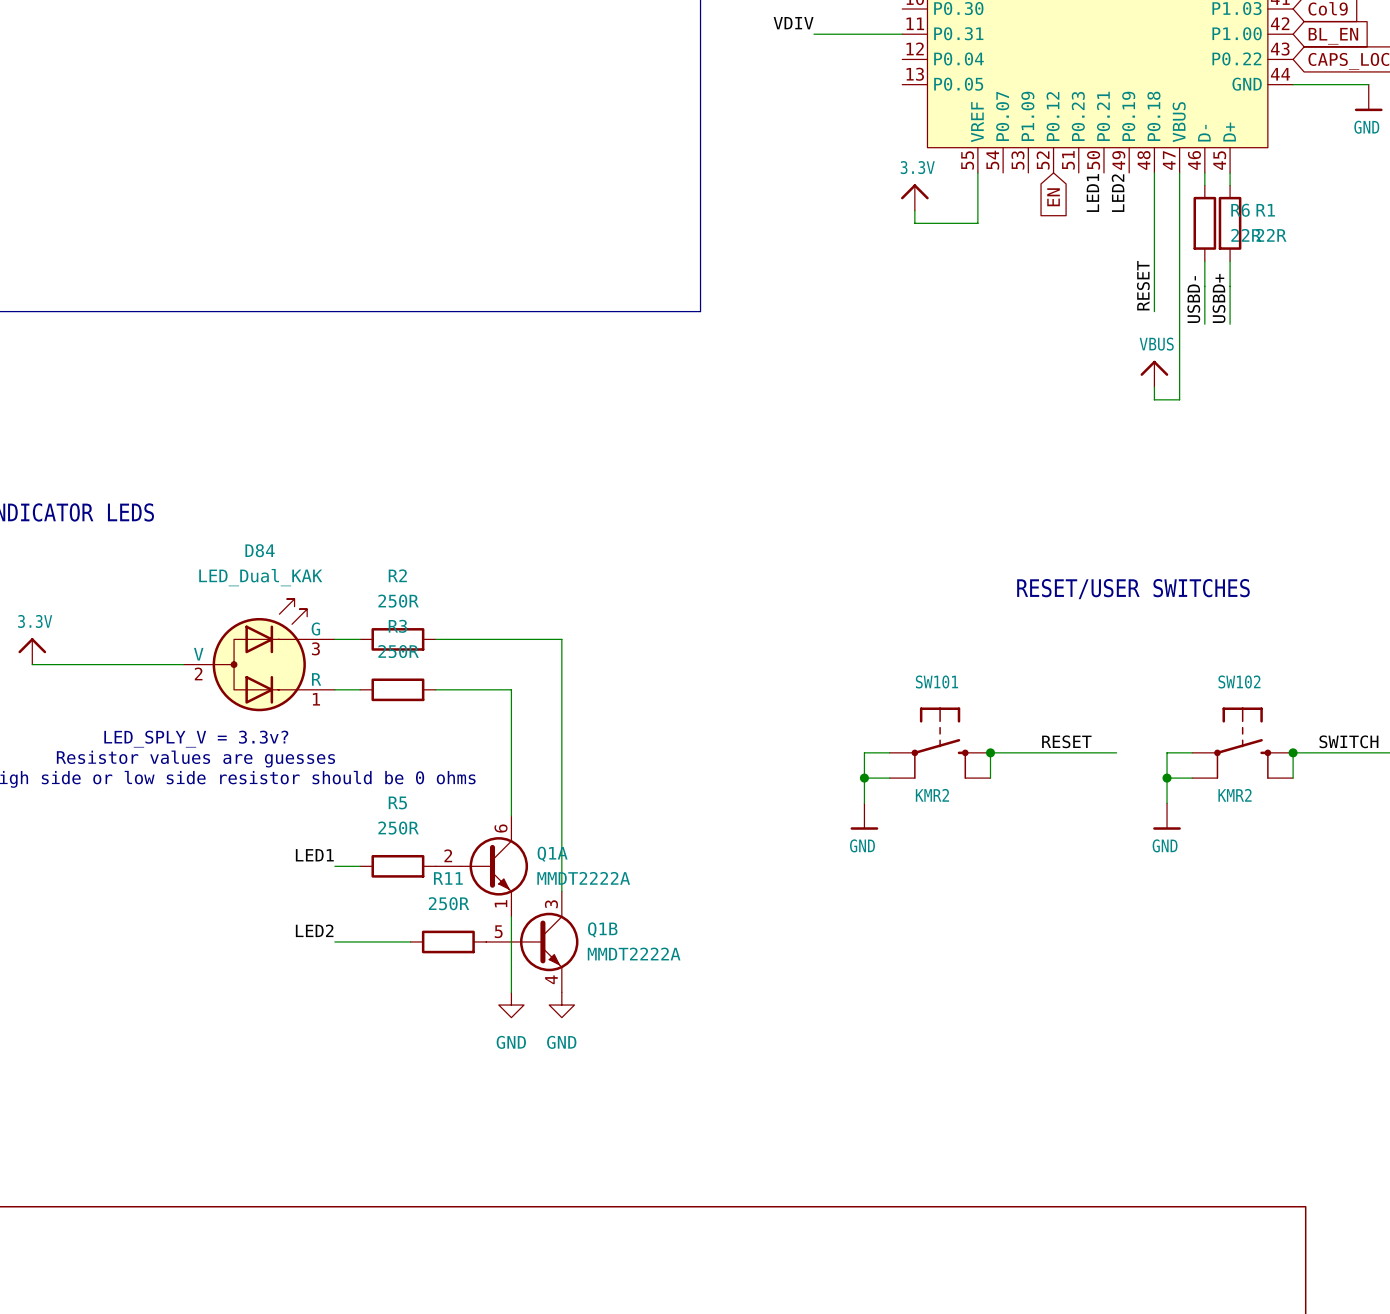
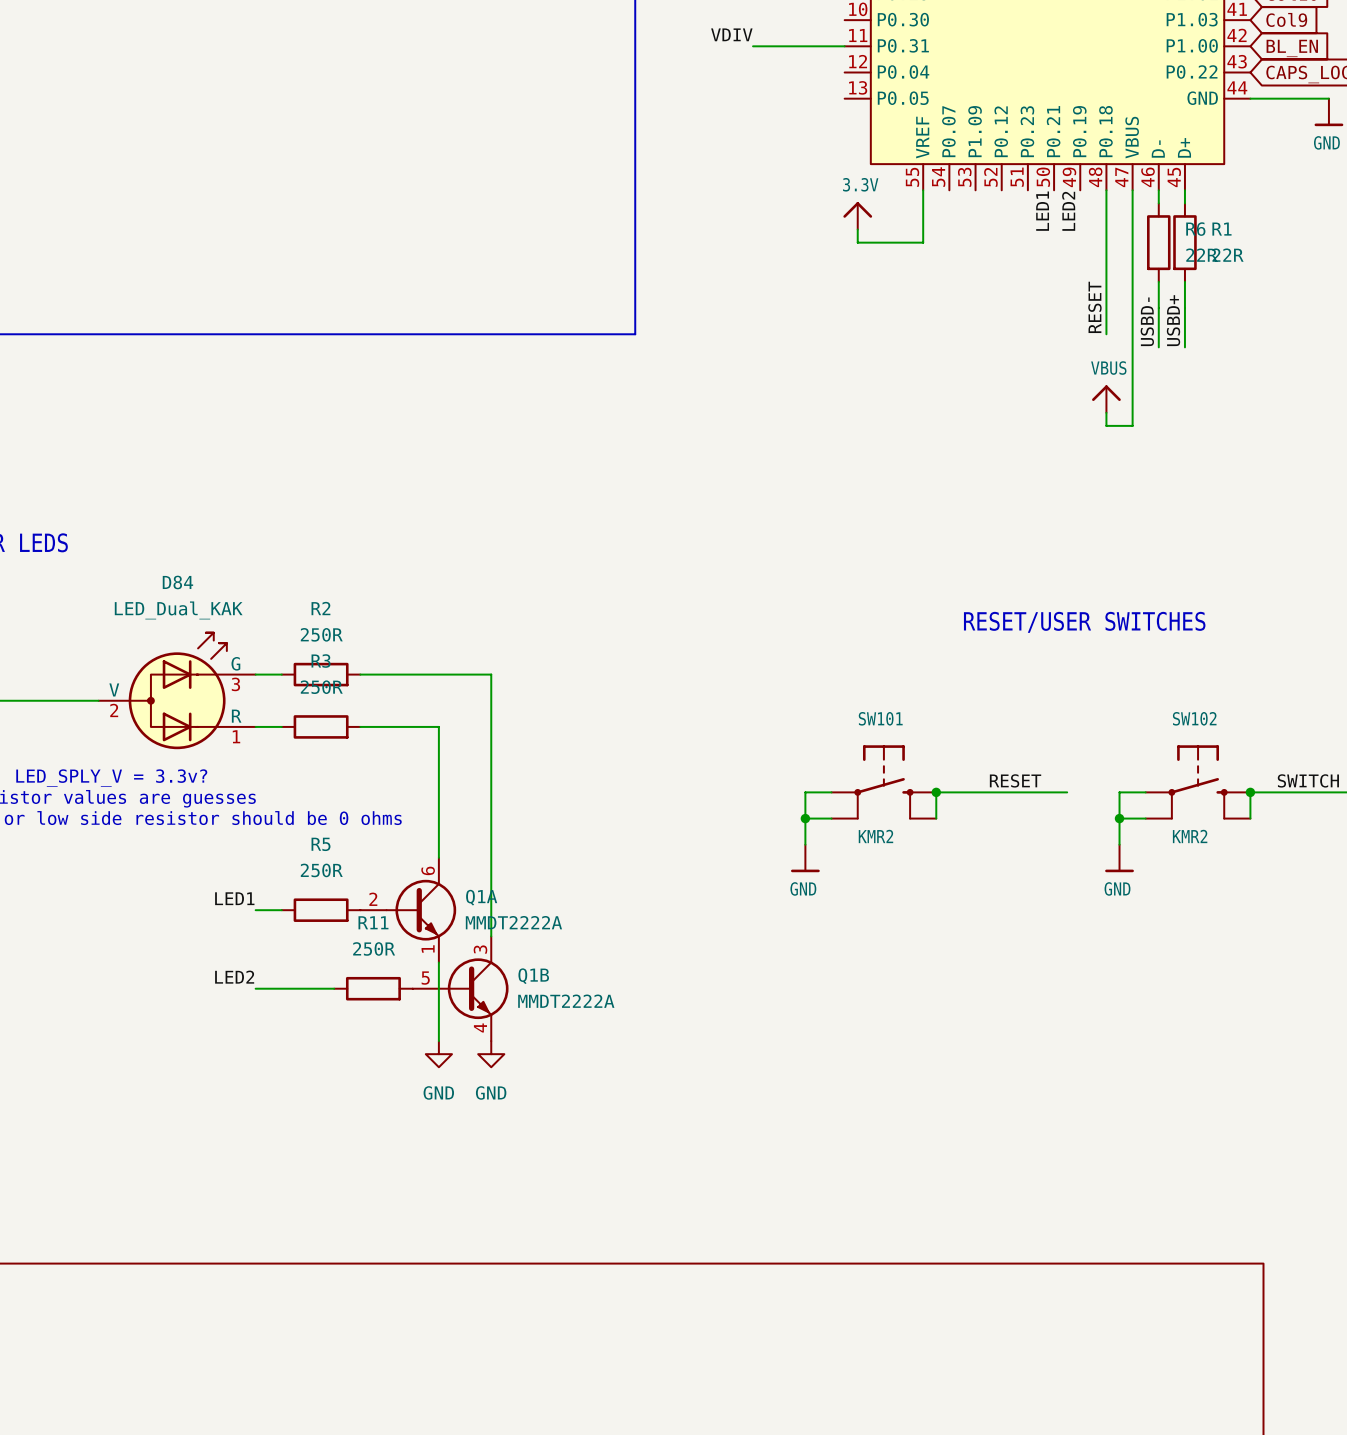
global label: EN (1053, 197) -> none

